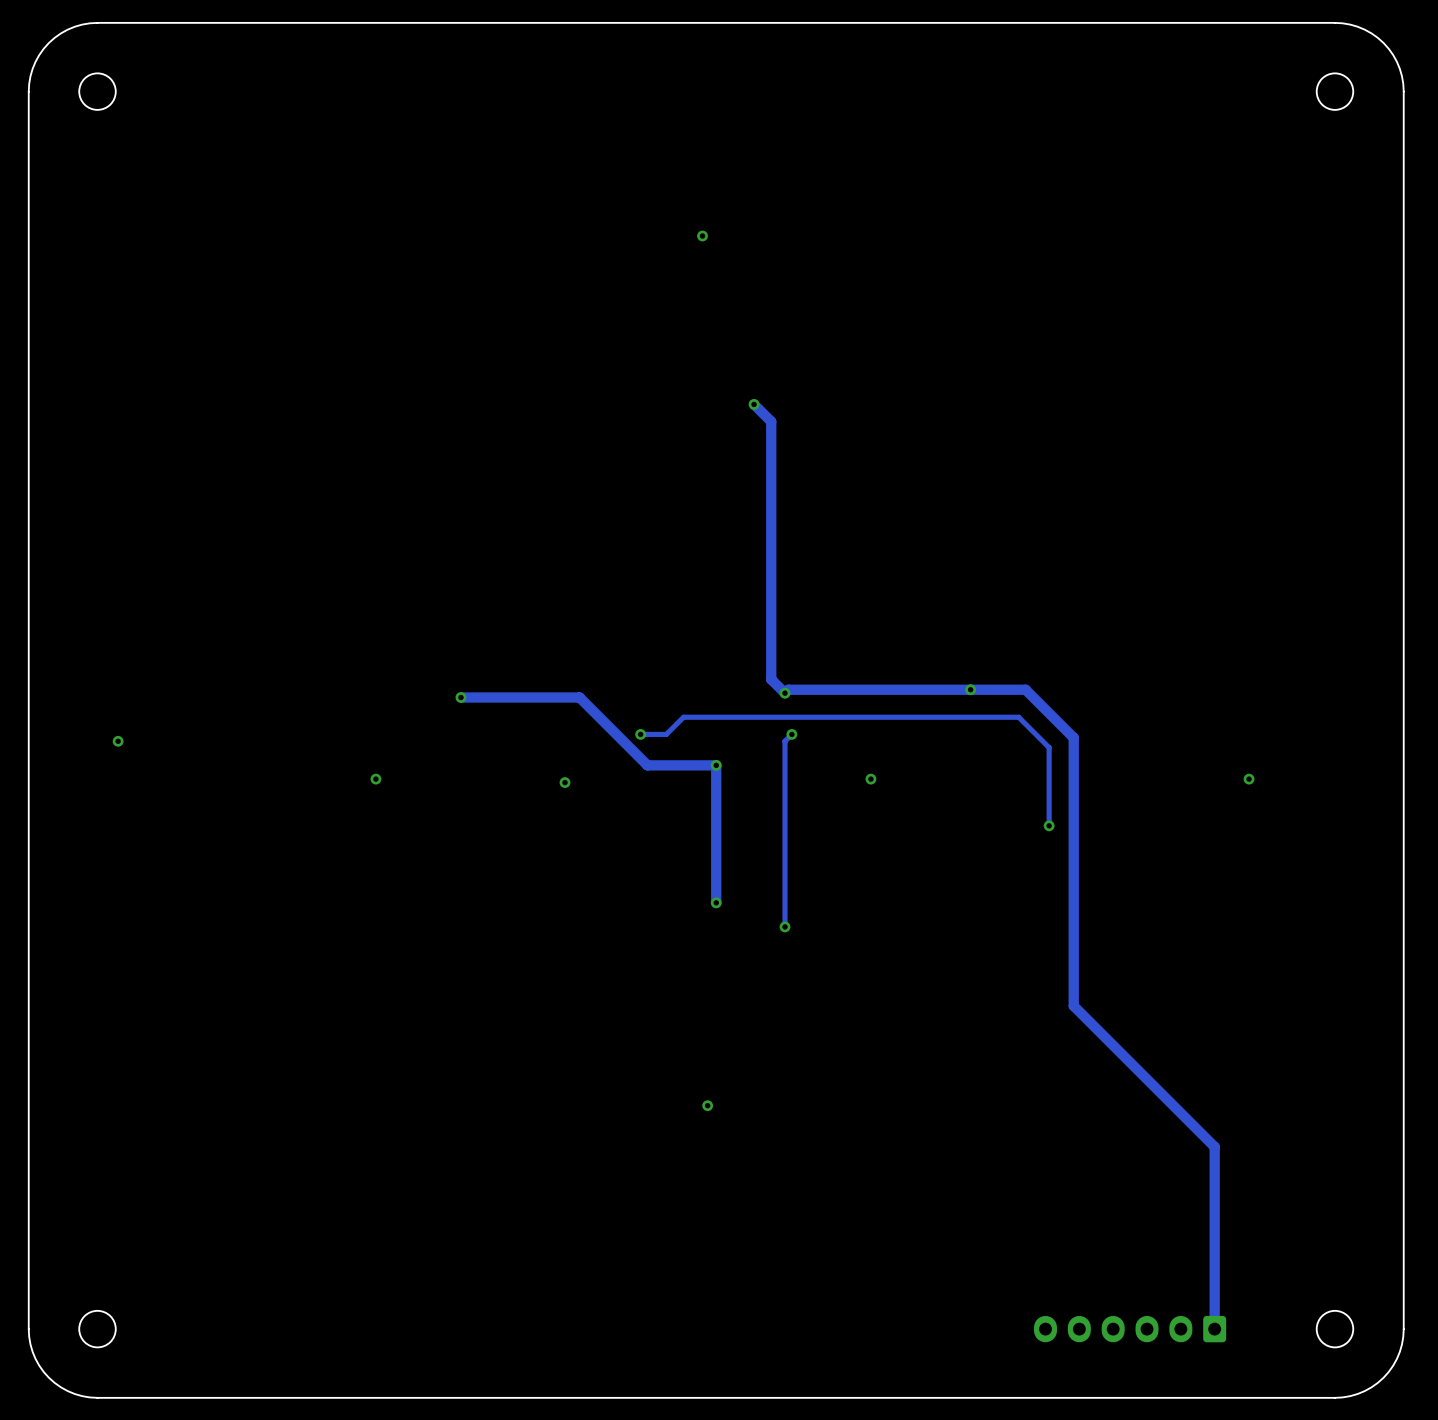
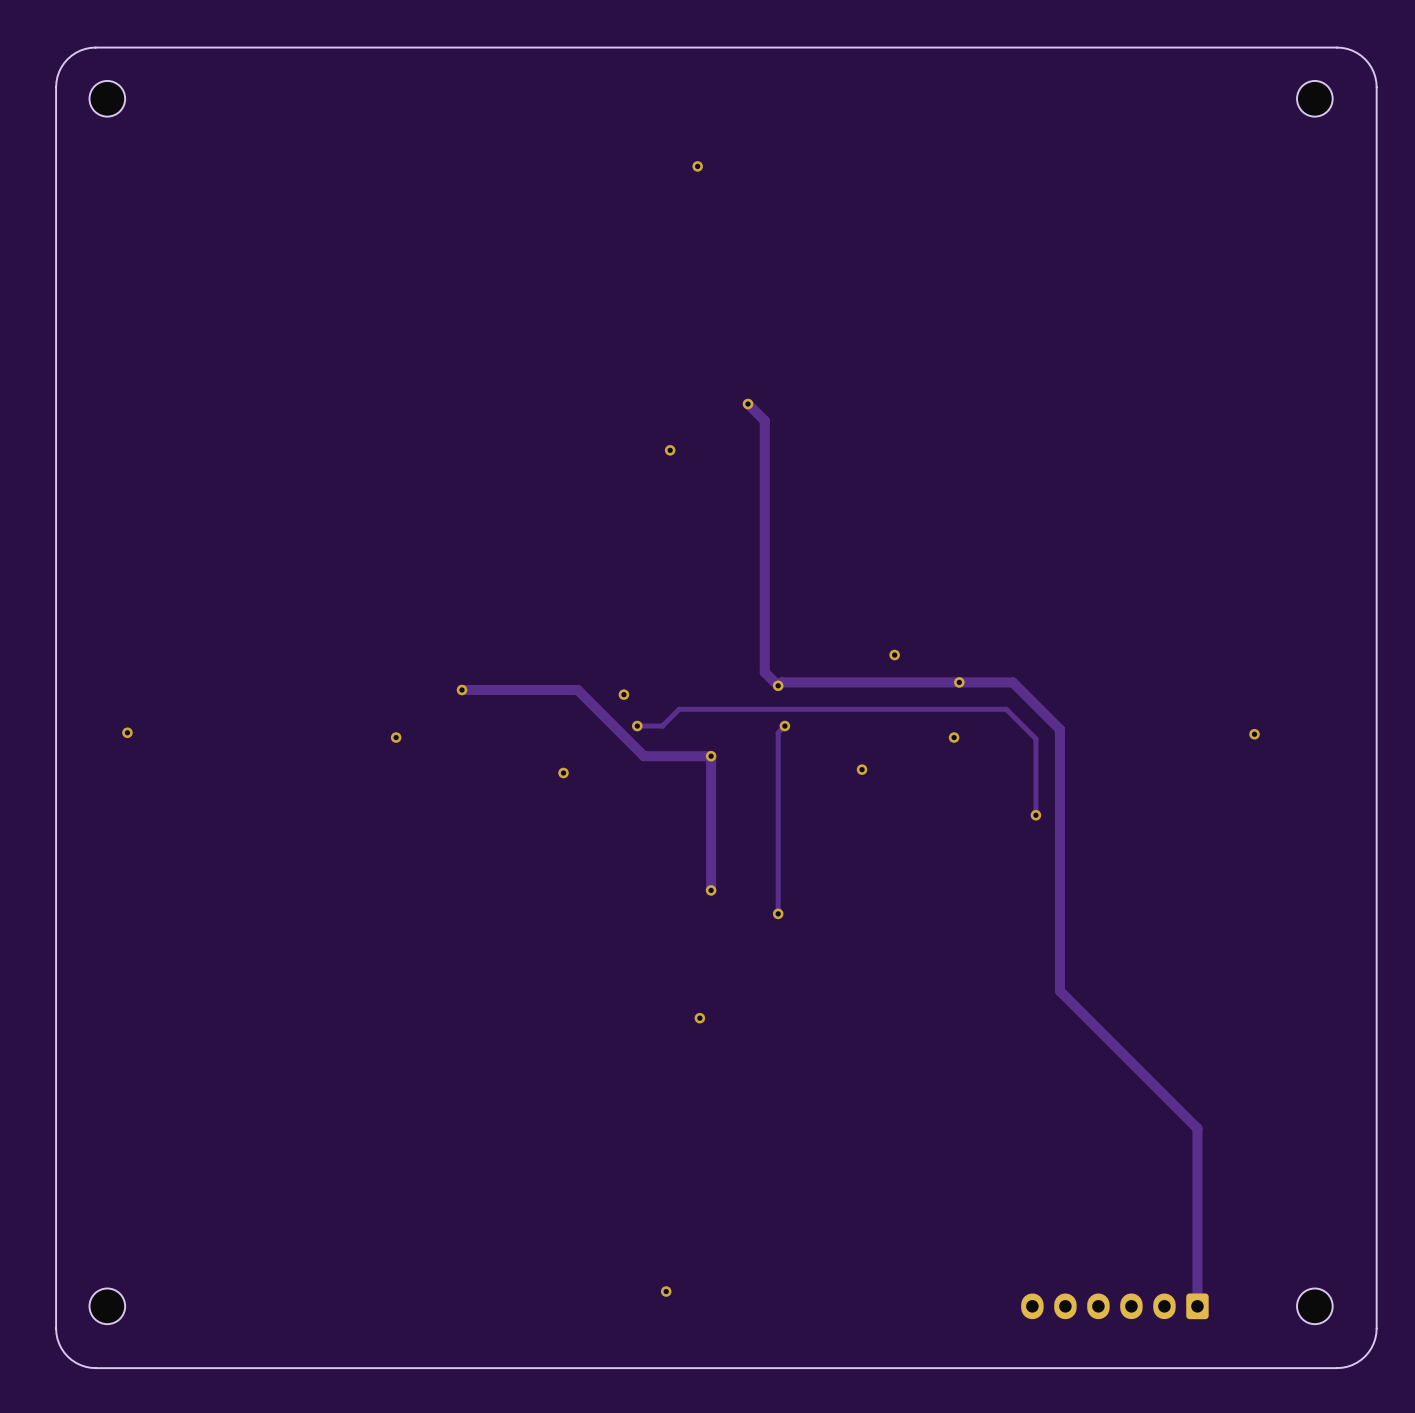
board edge: (1334, 22) (97, 22) (82, 24) (67, 29) (48, 43) (35, 61) (30, 76) (28, 91) (28, 1329) (32, 1351) (39, 1365) (48, 1377) (60, 1387) (74, 1394) (97, 1397) (1334, 1397) (1350, 1396) (1364, 1391) (1383, 1377) (1396, 1358) (1402, 1344) (1403, 1329) (1403, 91) (1402, 76) (1396, 61) (1383, 43) (1364, 29) (1350, 24) (1334, 22) -> (1337, 47) (1352, 50) (1365, 59) (1373, 72) (1376, 87) (1376, 1328) (1373, 1343) (1365, 1356) (1352, 1365) (1337, 1368) (95, 1368) (80, 1365) (67, 1356) (59, 1343) (56, 1328) (56, 87) (59, 72) (67, 59) (80, 50) (95, 47) (1337, 47)
via position: (702, 236) -> (697, 166)
via: none -> (670, 450)
via: none -> (894, 655)
via: none -> (623, 694)
via: none -> (954, 737)
via position: (375, 779) -> (396, 737)
via position: (1249, 779) -> (1254, 734)
via position: (707, 1105) -> (699, 1018)
via: none -> (666, 1291)

